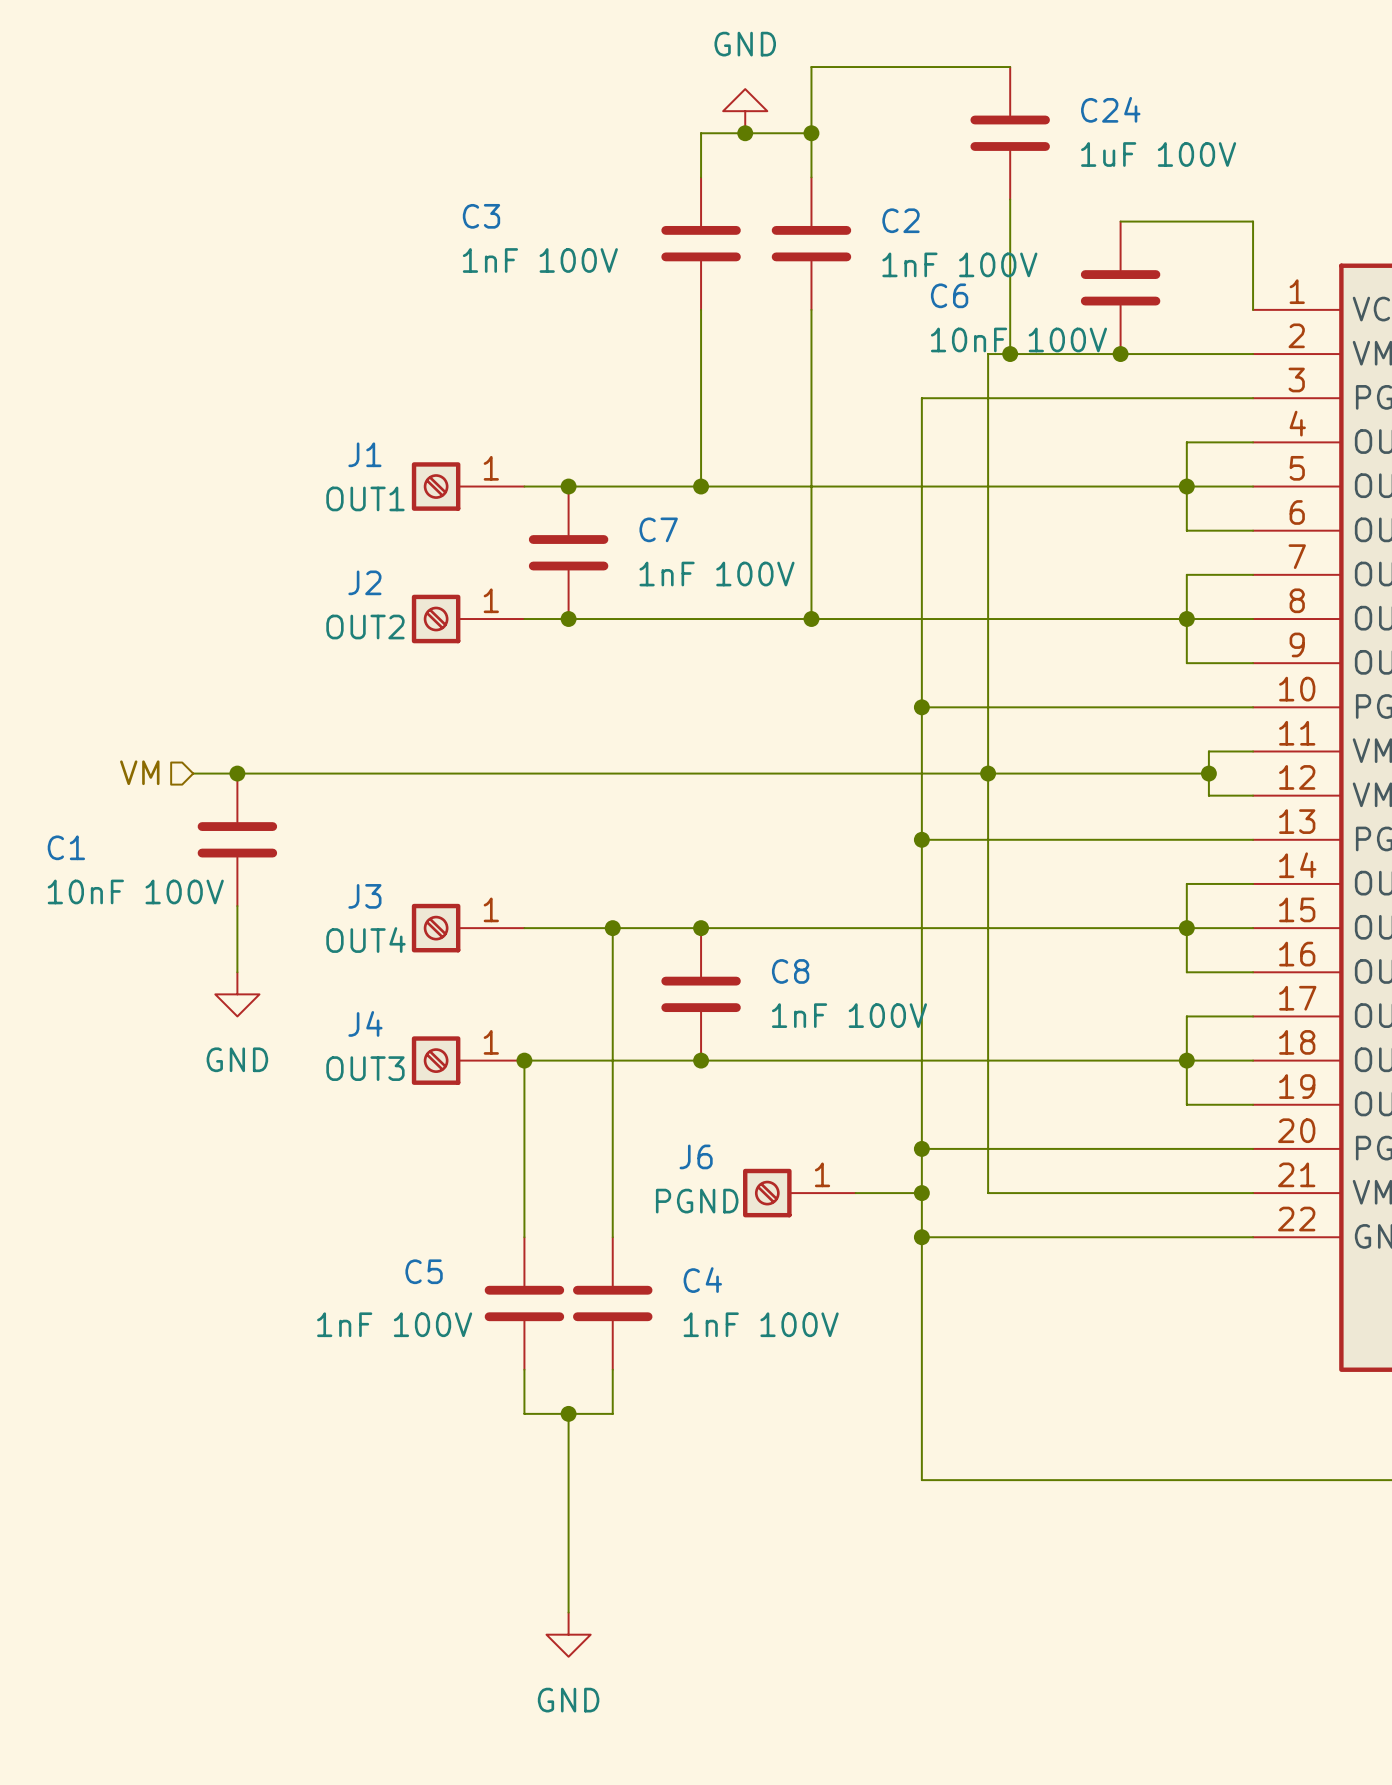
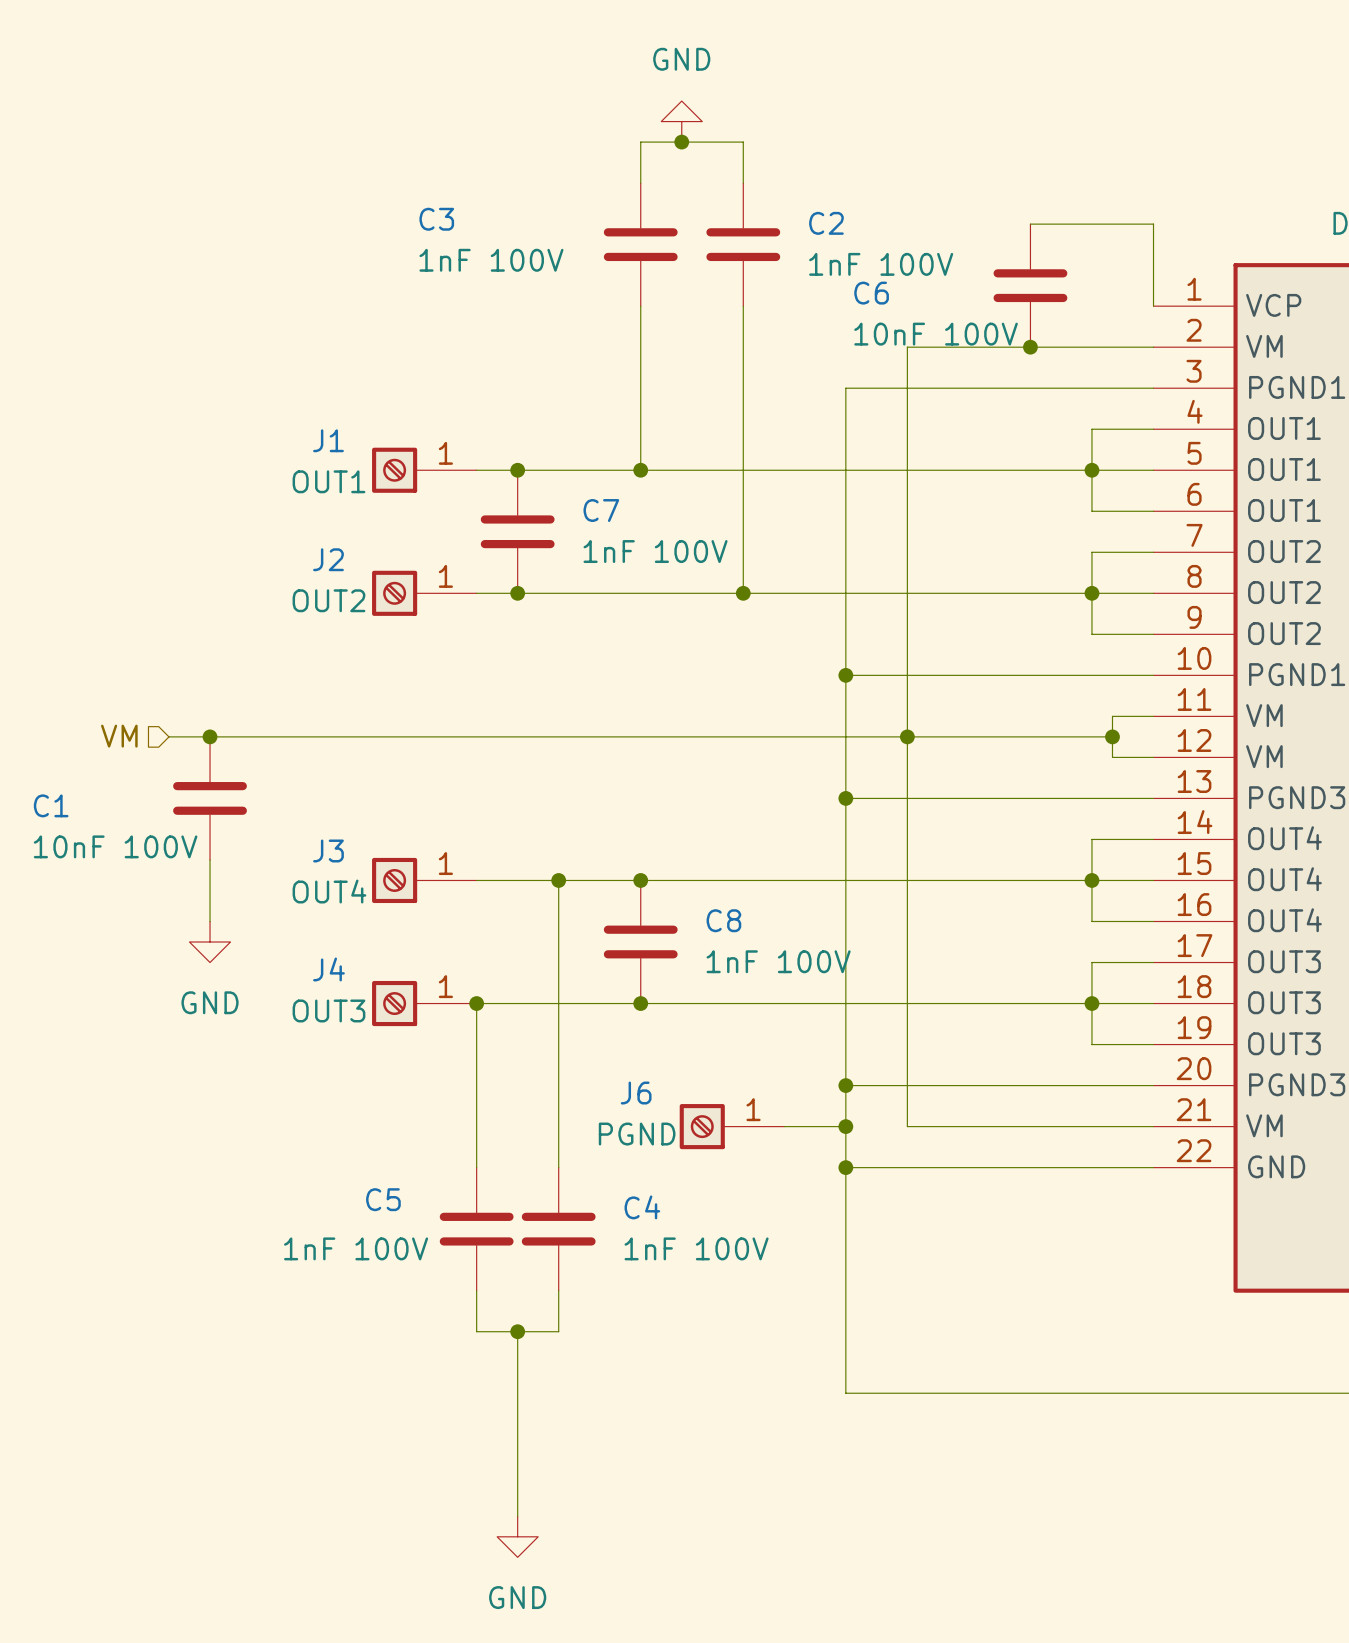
wire: (1010, 67) (811, 67) (811, 133) -> none
junction: (811, 133) -> none
C24: 1uF 100V (1010, 133) -> none
wire: (1010, 199) (1010, 354) -> none
junction: (1010, 354) -> none

